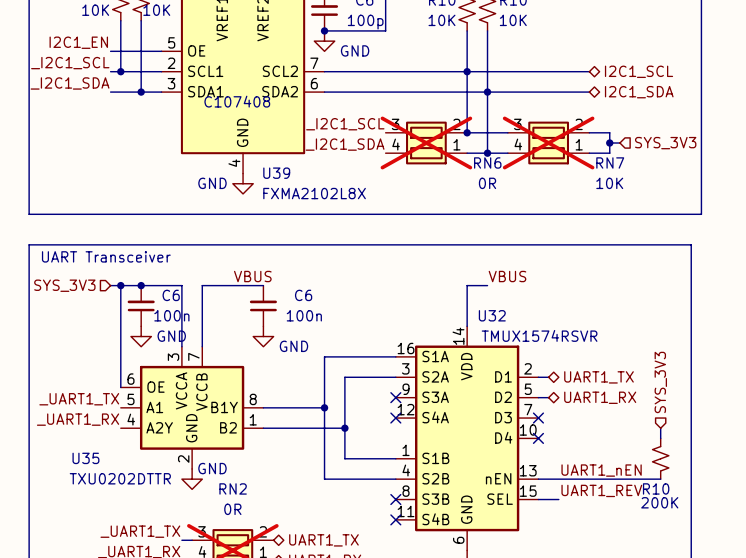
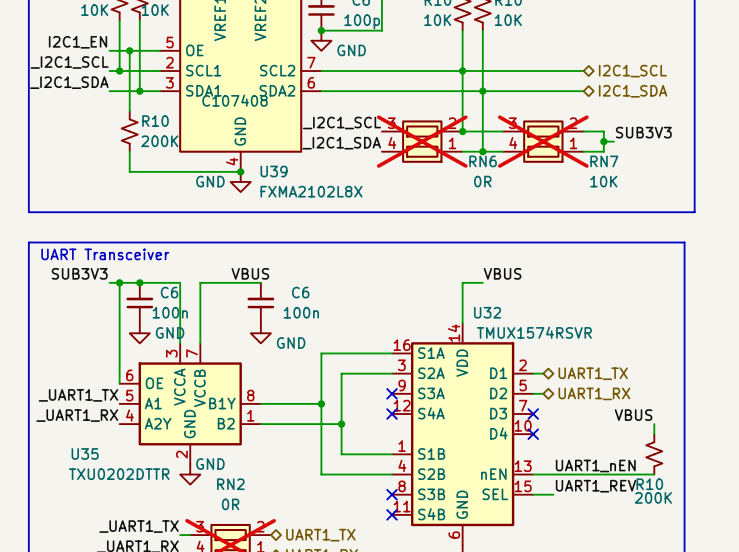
wire: none -> (129, 50) (129, 111)
junction: none -> (129, 50)
R10: none -> 200K (129, 131)
label: none -> SUB3V3 (643, 132)
hierarchical label: SYS_3V3 (665, 143) -> none
wire: none -> (129, 151) (129, 171) (240, 171)
junction: none -> (240, 171)
label: none -> SUB3V3 (79, 273)
hierarchical label: SYS_3V3 (64, 285) -> none
hierarchical label: SYS_3V3 (660, 382) -> none
label: none -> VBUS (633, 415)

